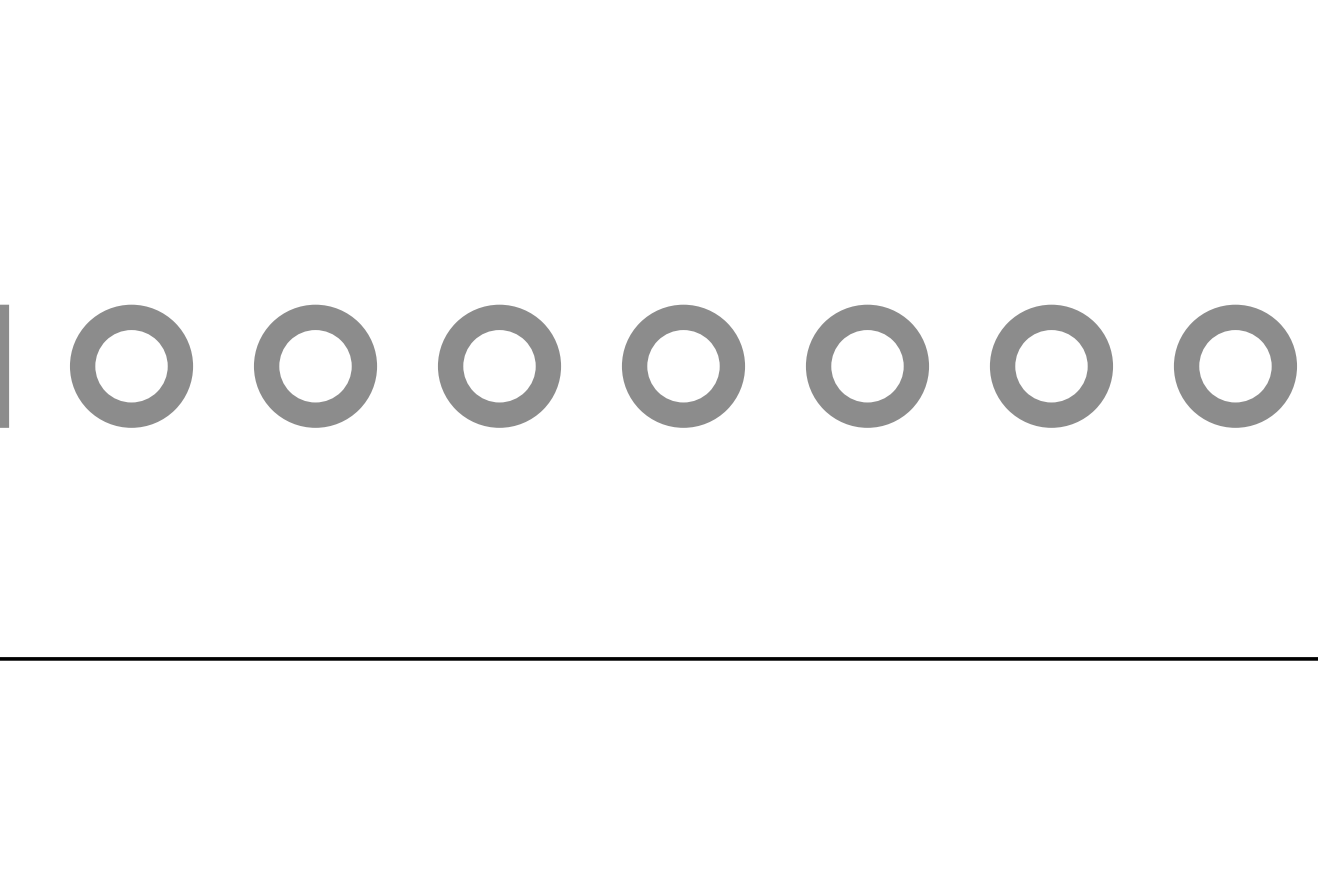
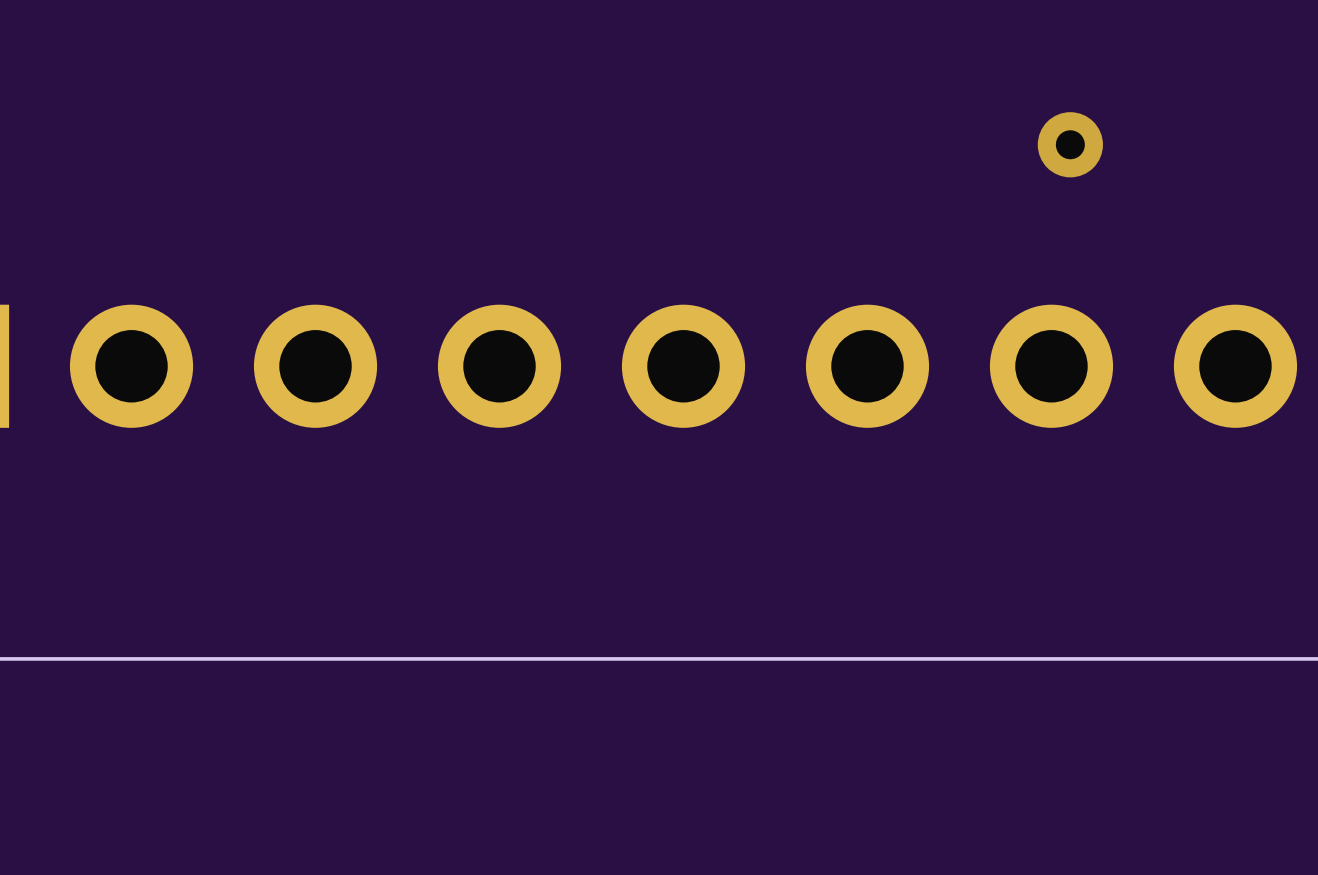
via: none -> (1070, 144)

